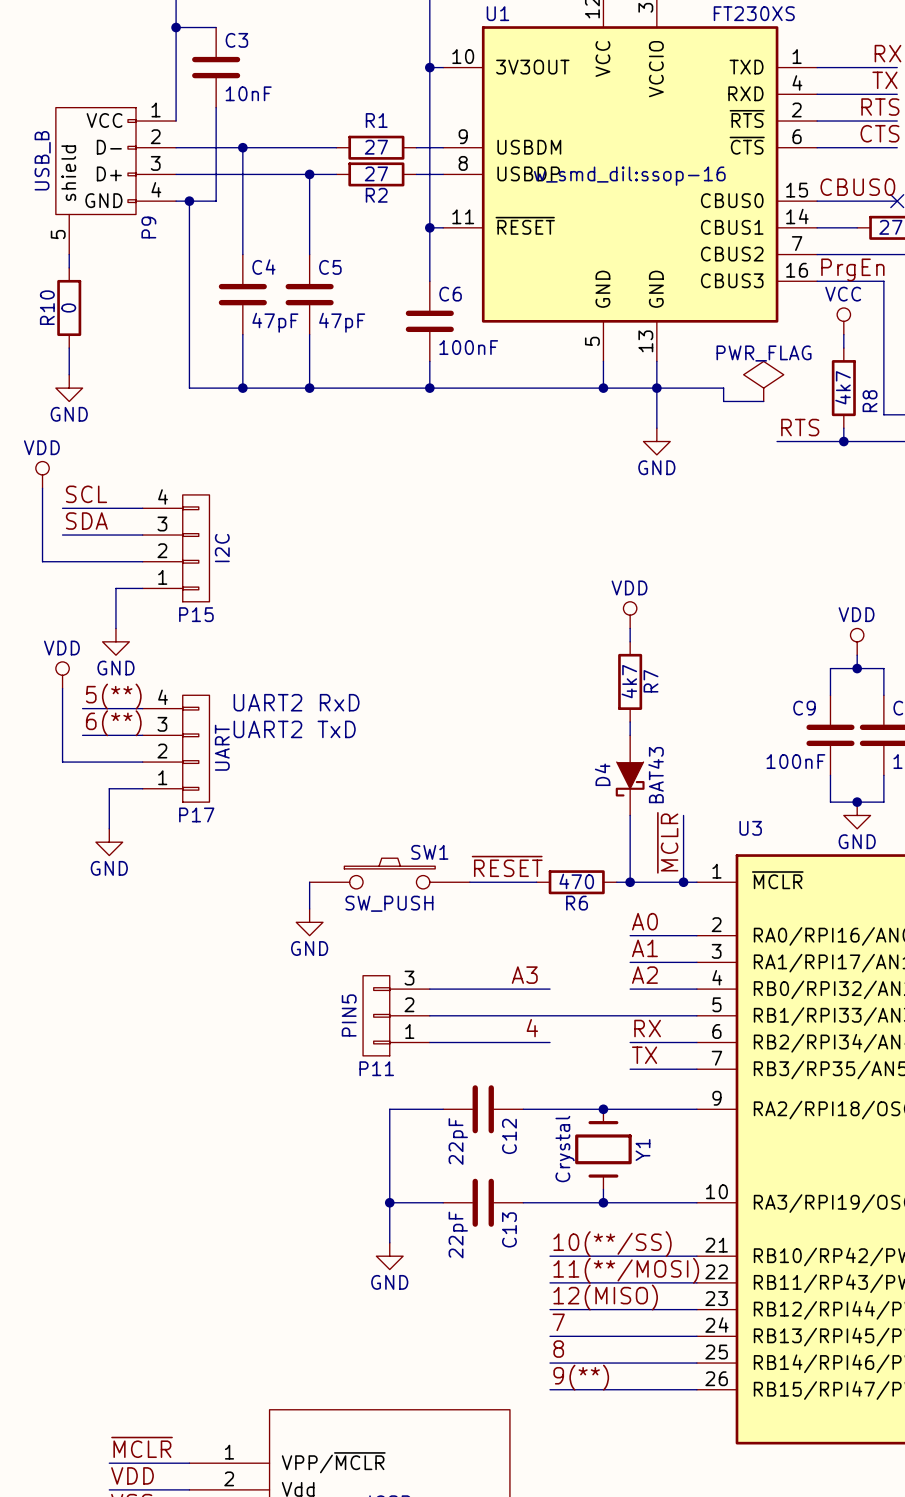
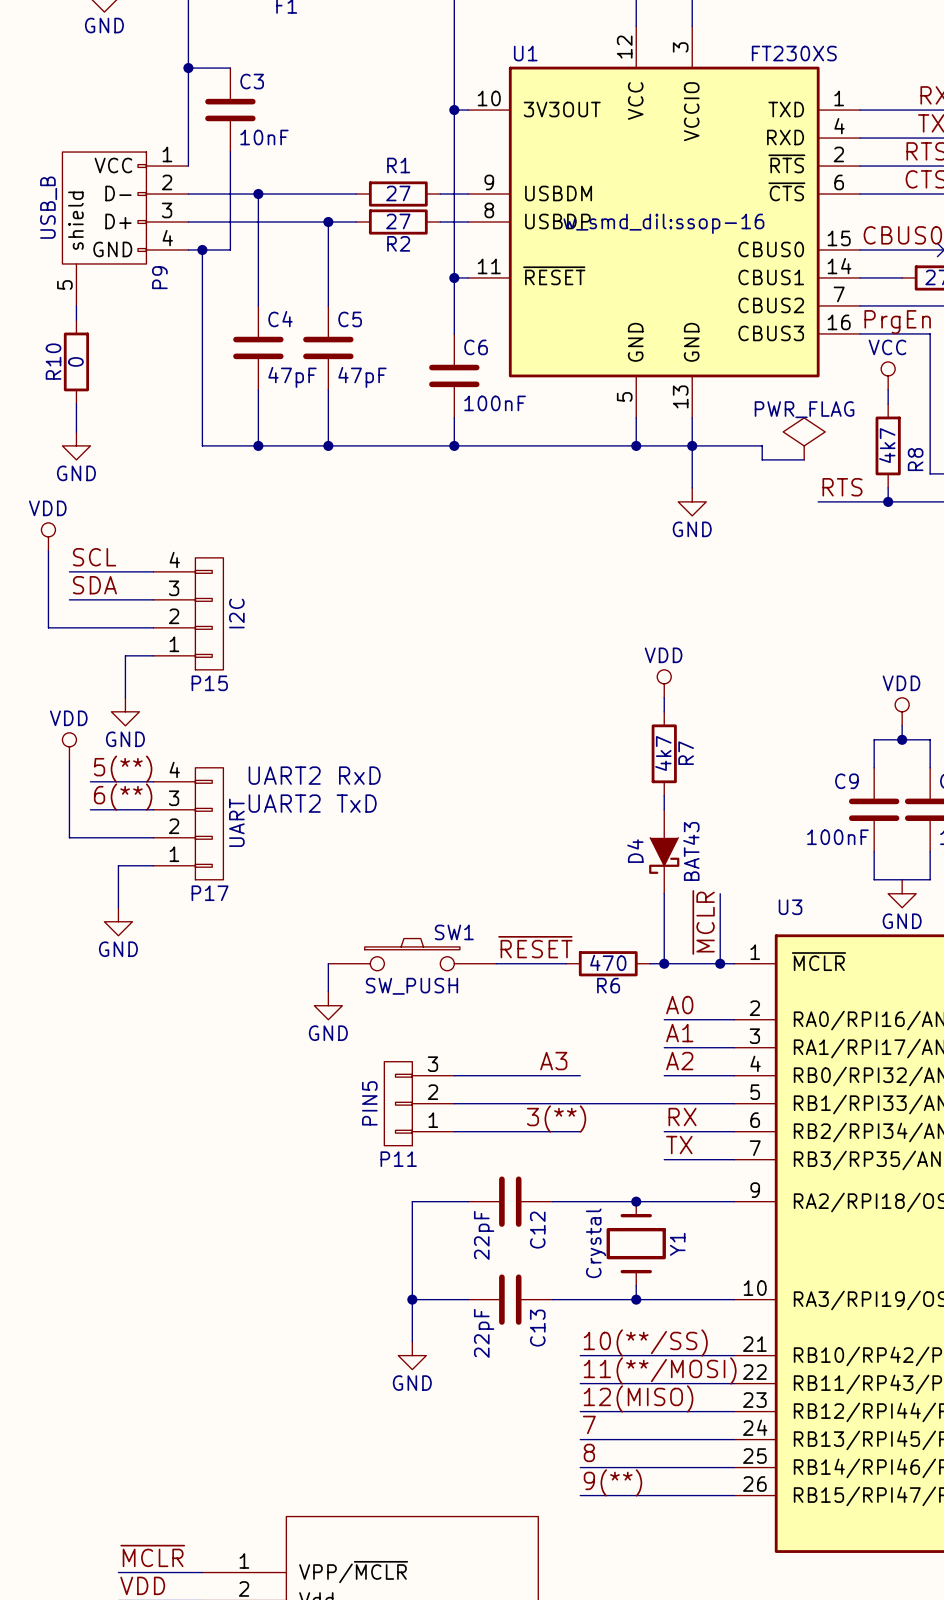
junction: (857, 802) -> none
label: 4 (532, 1028) -> none
label: none -> 3(**) (556, 1119)

